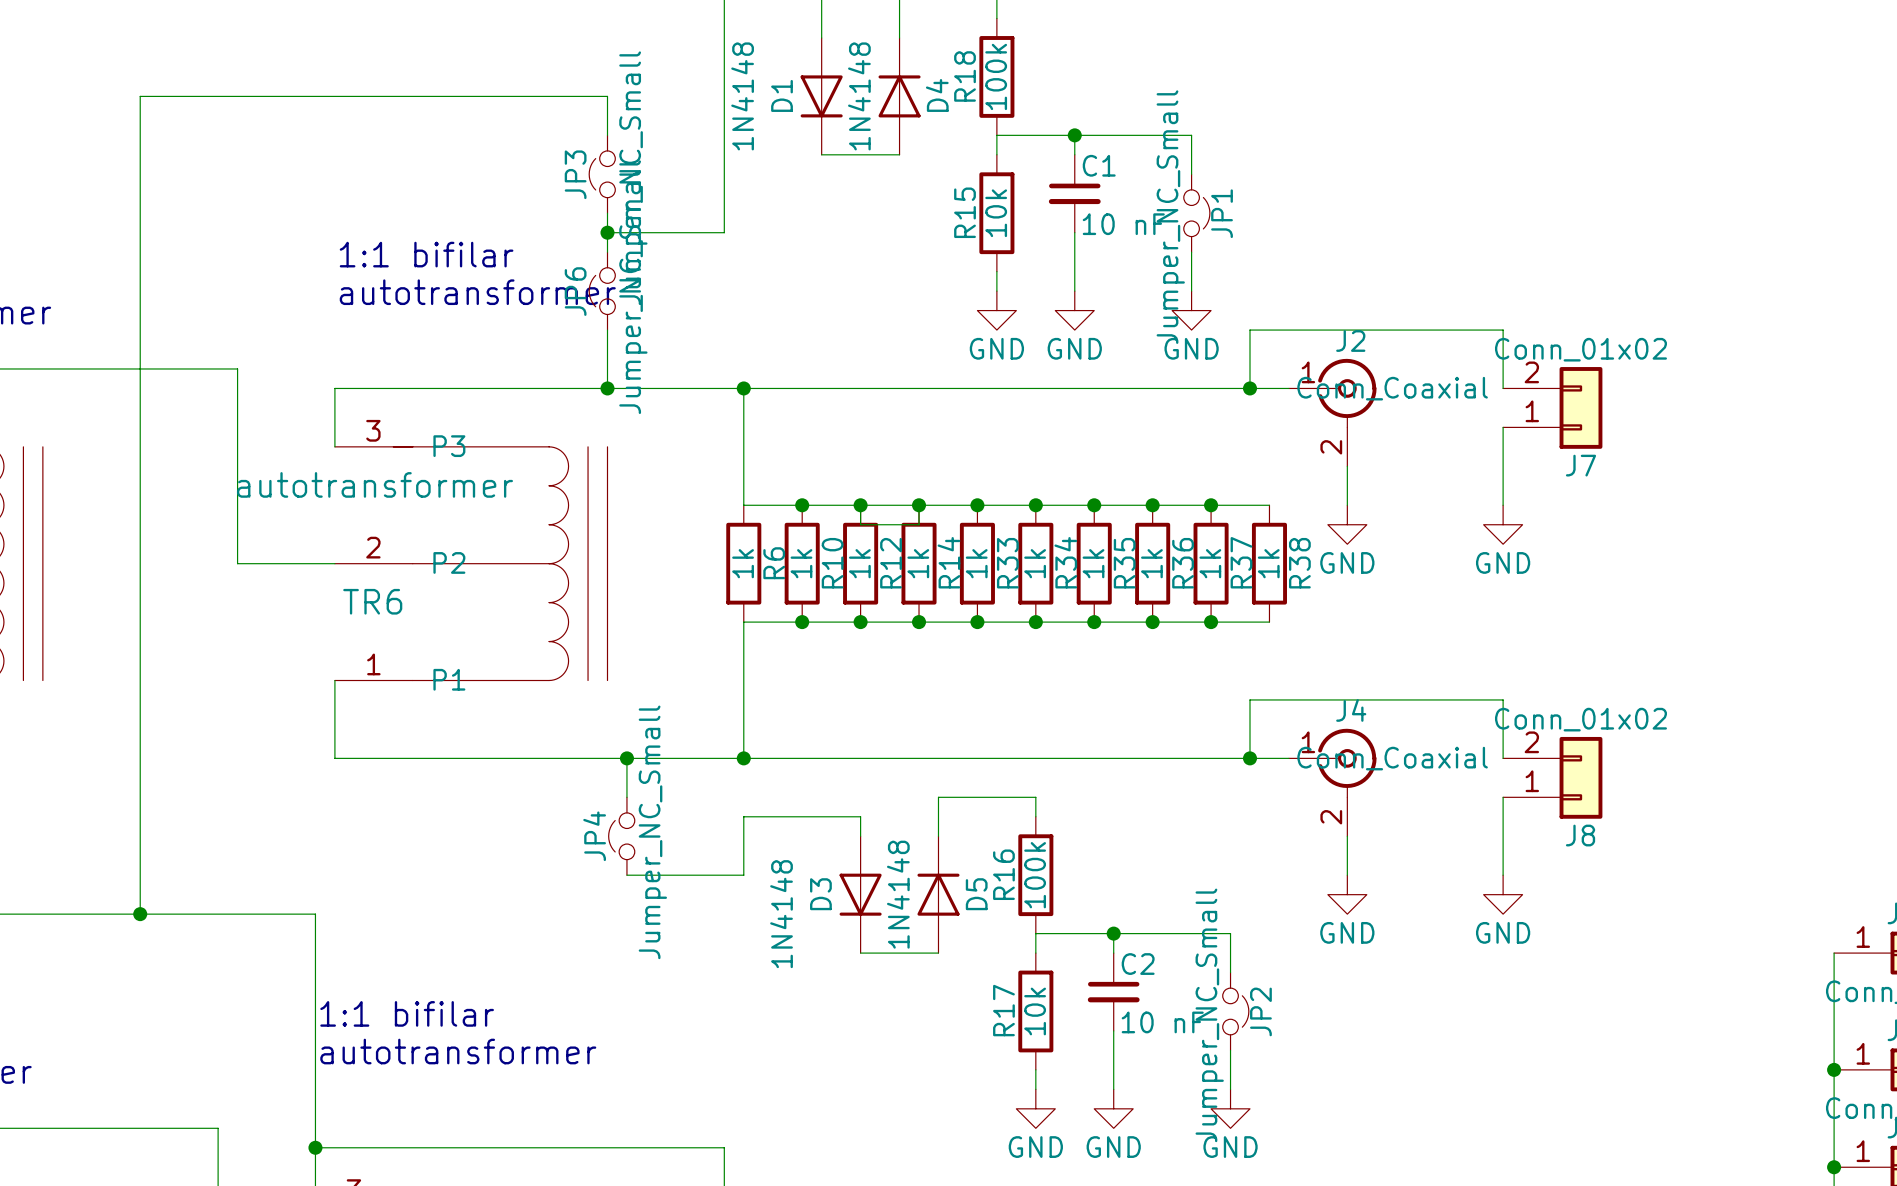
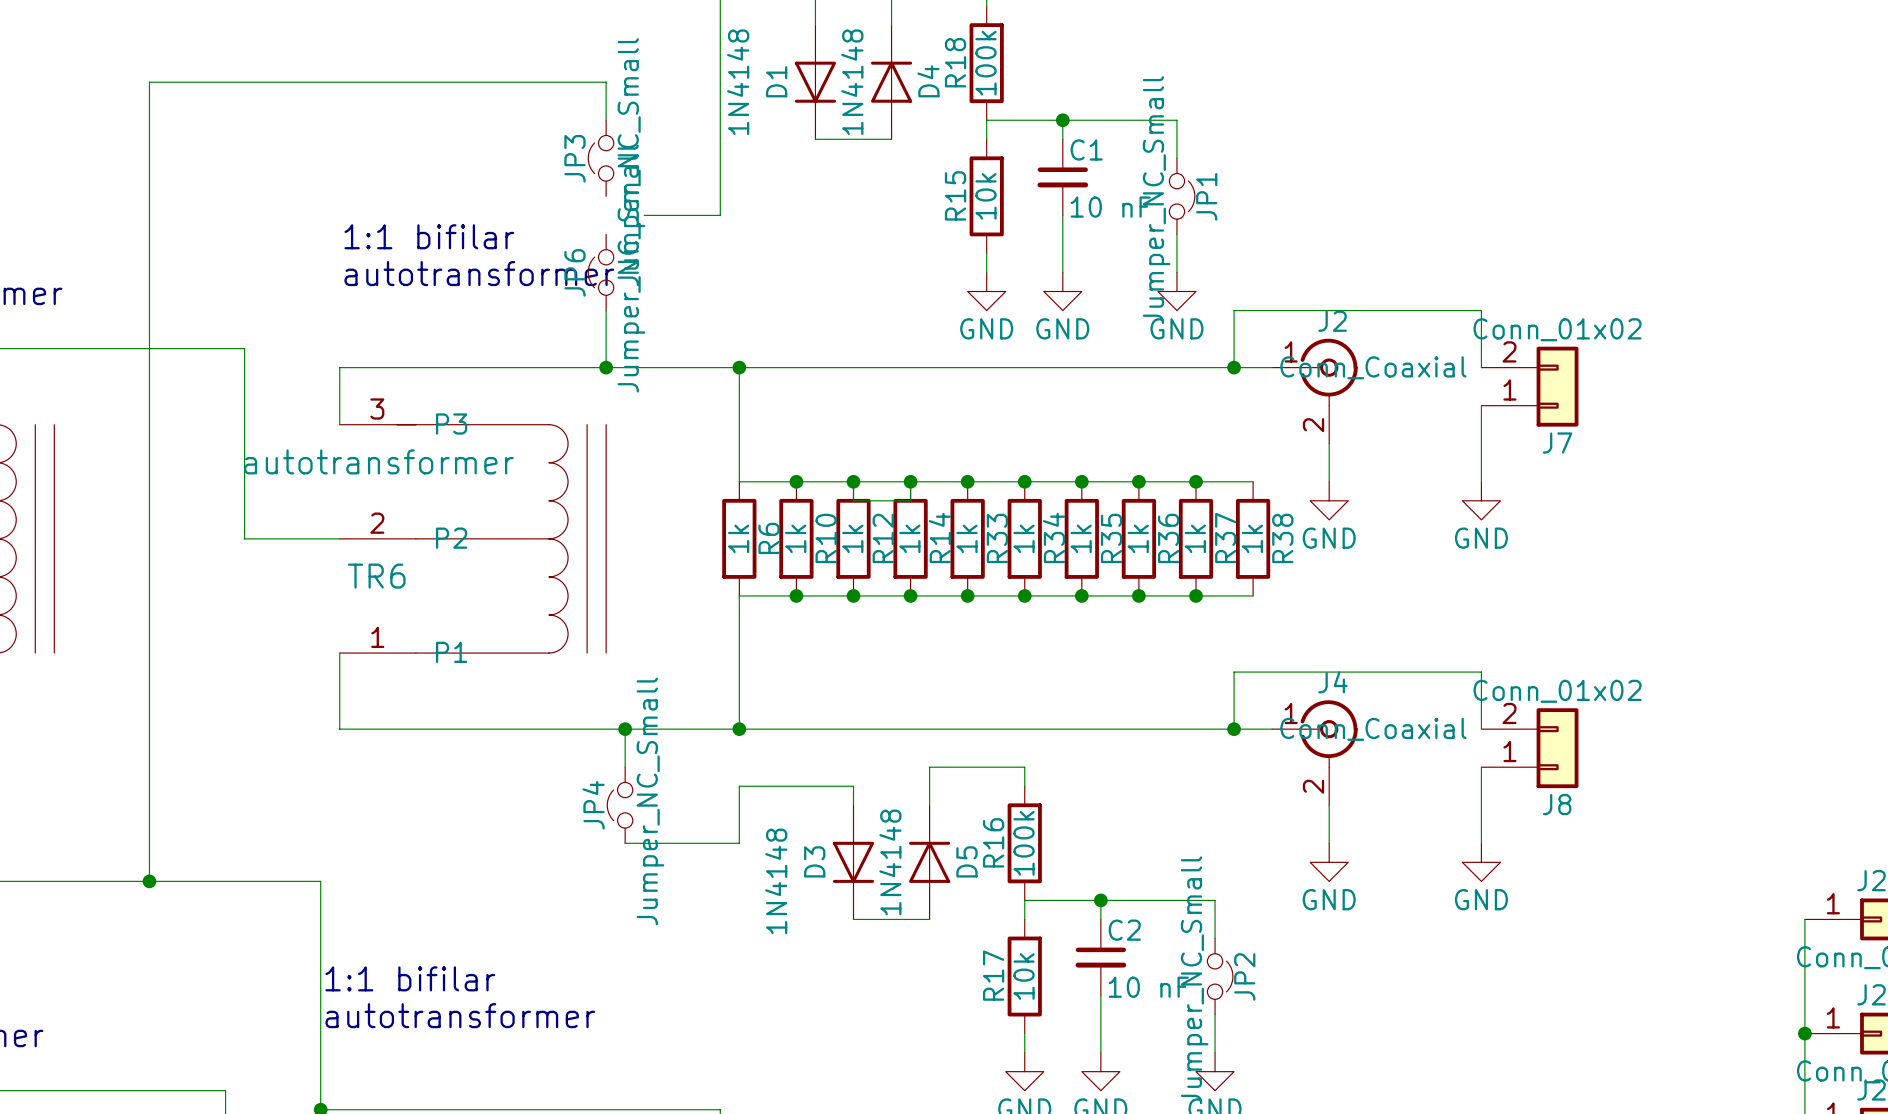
wire: (607, 213) (607, 252) -> none
wire: (607, 232) (646, 232) -> none
junction: (607, 232) -> none

